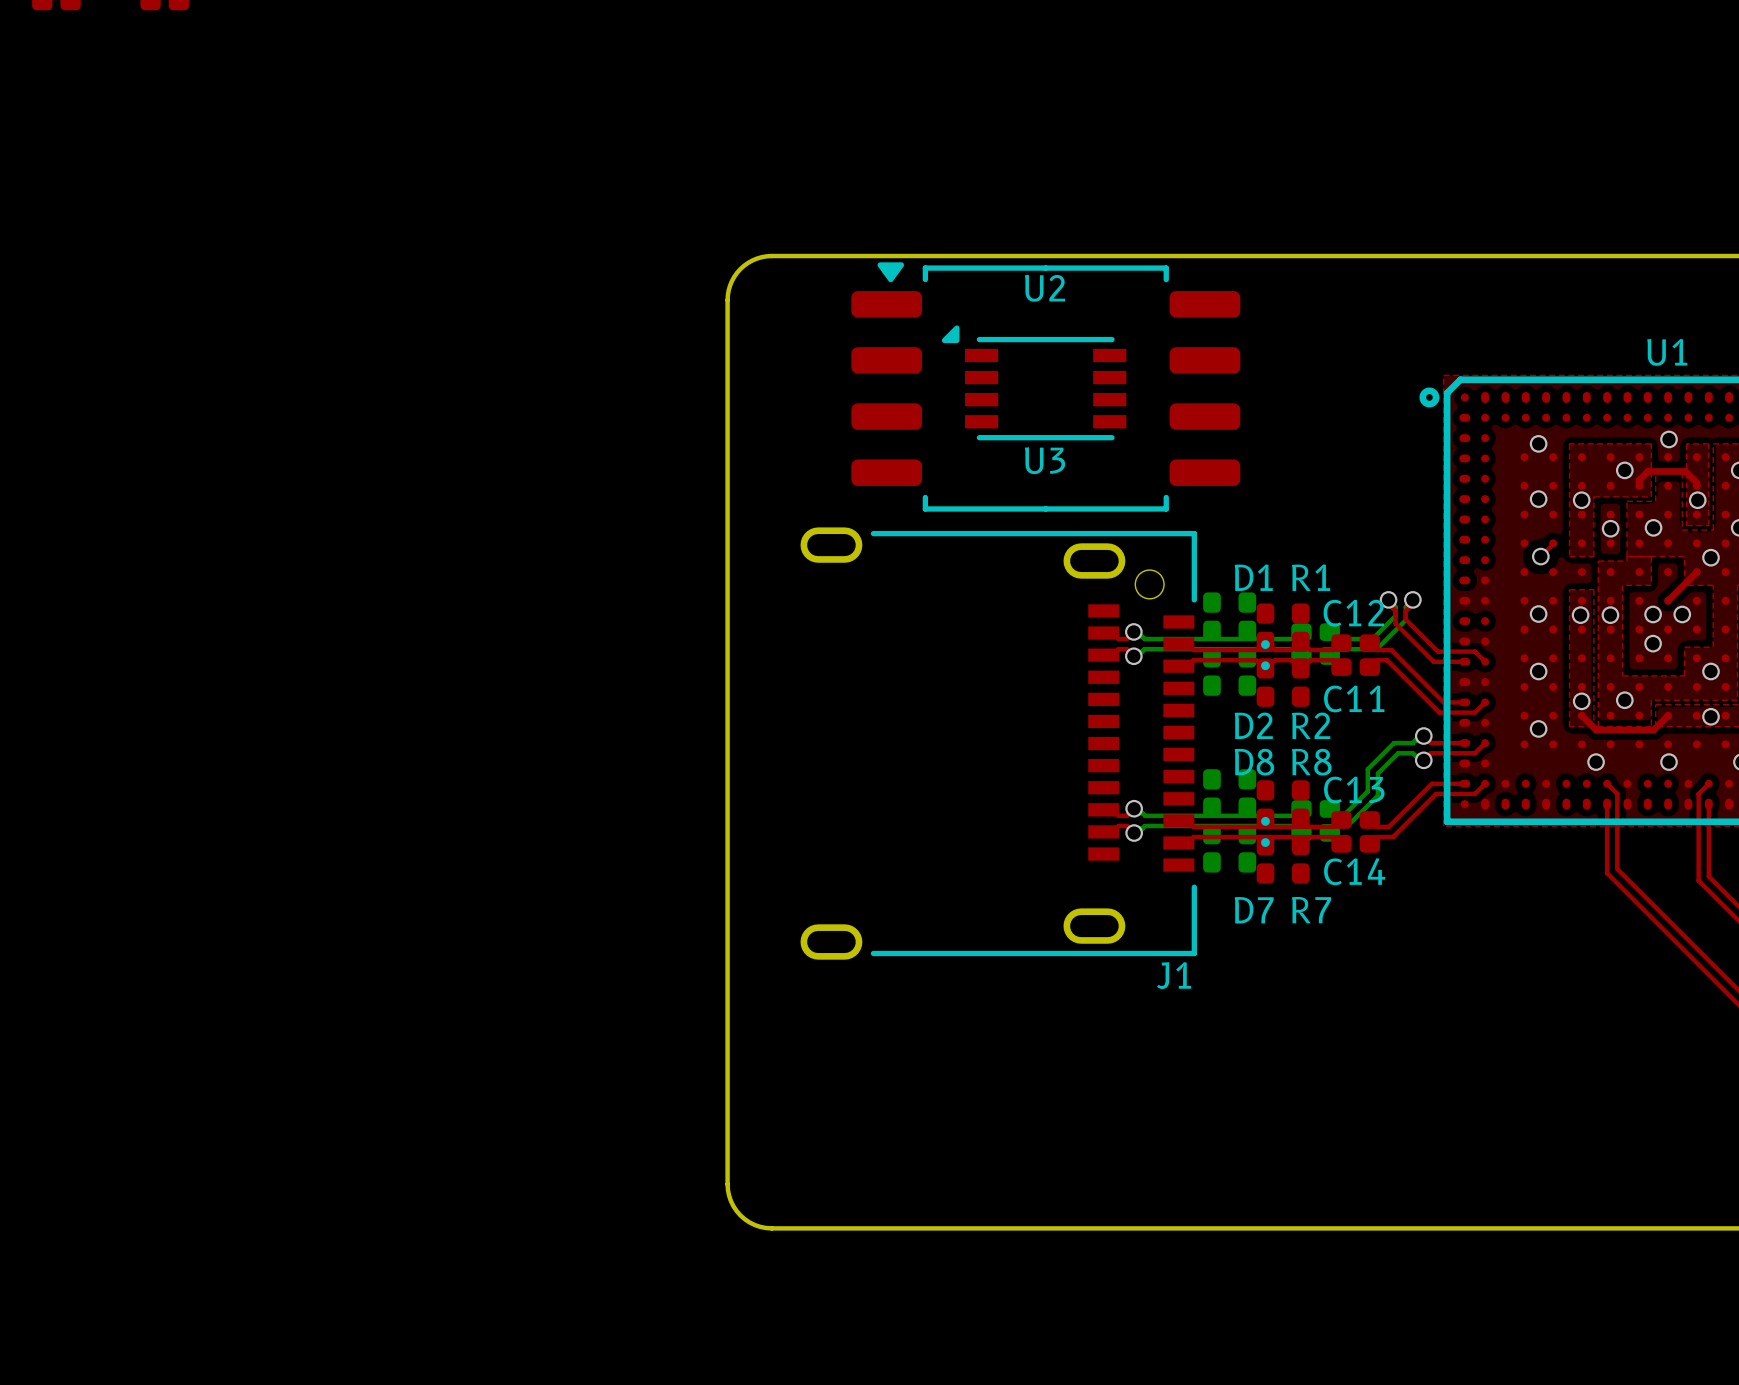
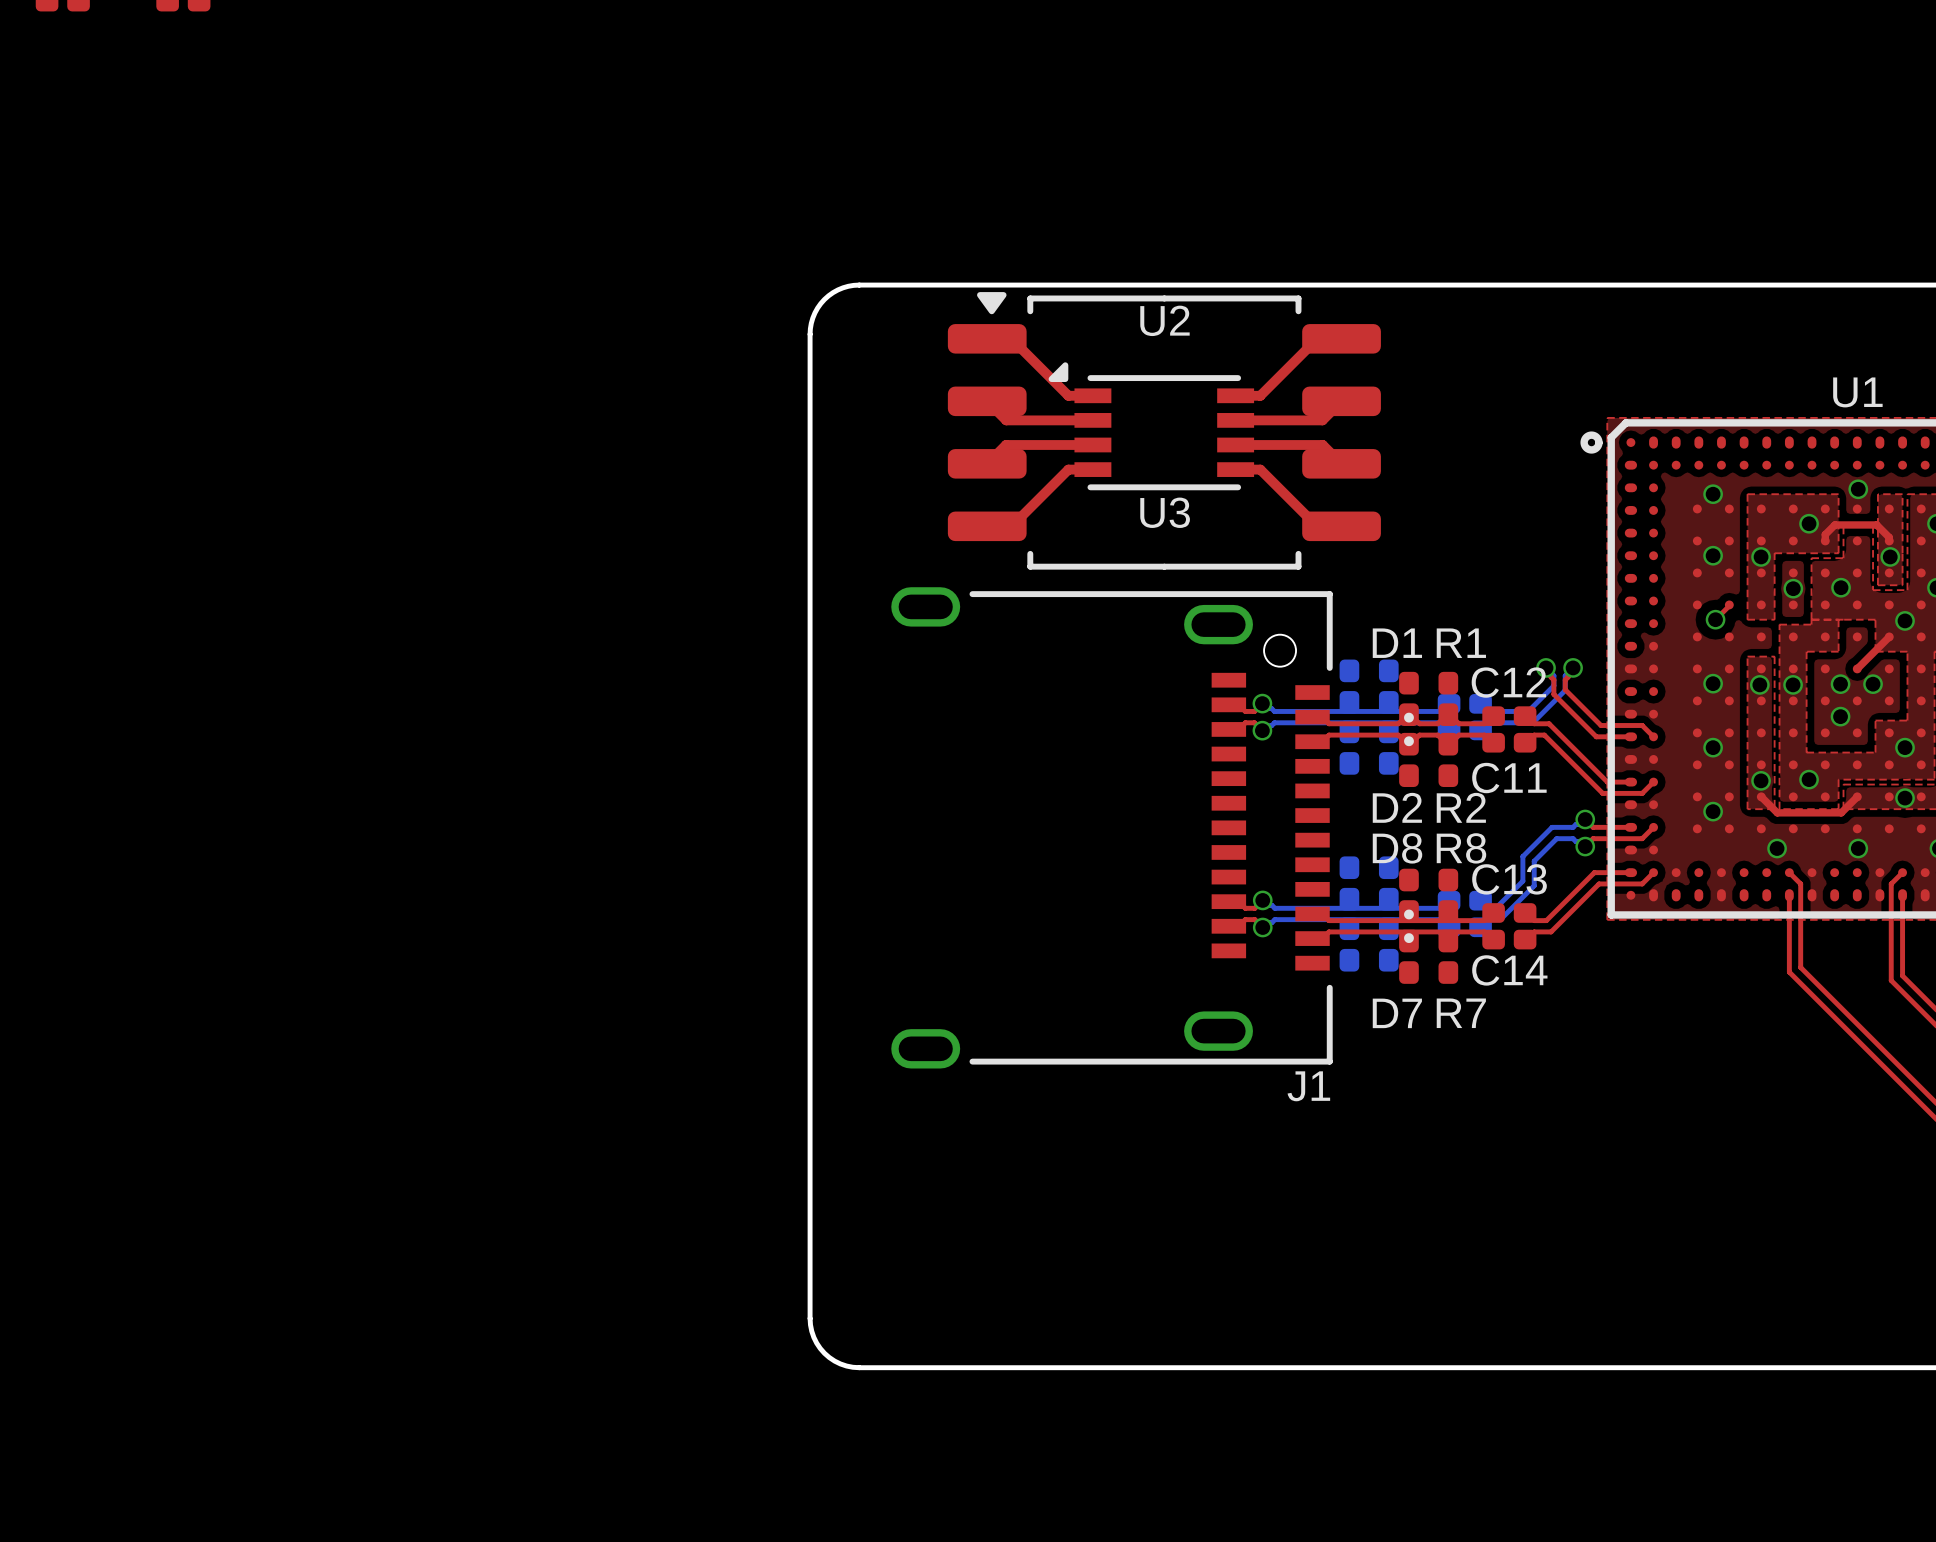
top track: none -> (987, 338) (1011, 338) (1068, 395) (1092, 395)
top track: none -> (1341, 338) (1317, 338) (1260, 395) (1235, 395)
top track: none -> (987, 401) (1006, 420) (1092, 420)
top track: none -> (1341, 401) (1322, 420) (1235, 420)
top track: none -> (1092, 444) (1006, 444) (987, 463)
top track: none -> (1235, 444) (1322, 444) (1341, 463)
top track: none -> (1092, 469) (1068, 469) (1011, 526) (987, 526)
top track: none -> (1235, 469) (1260, 469) (1317, 526) (1341, 526)

